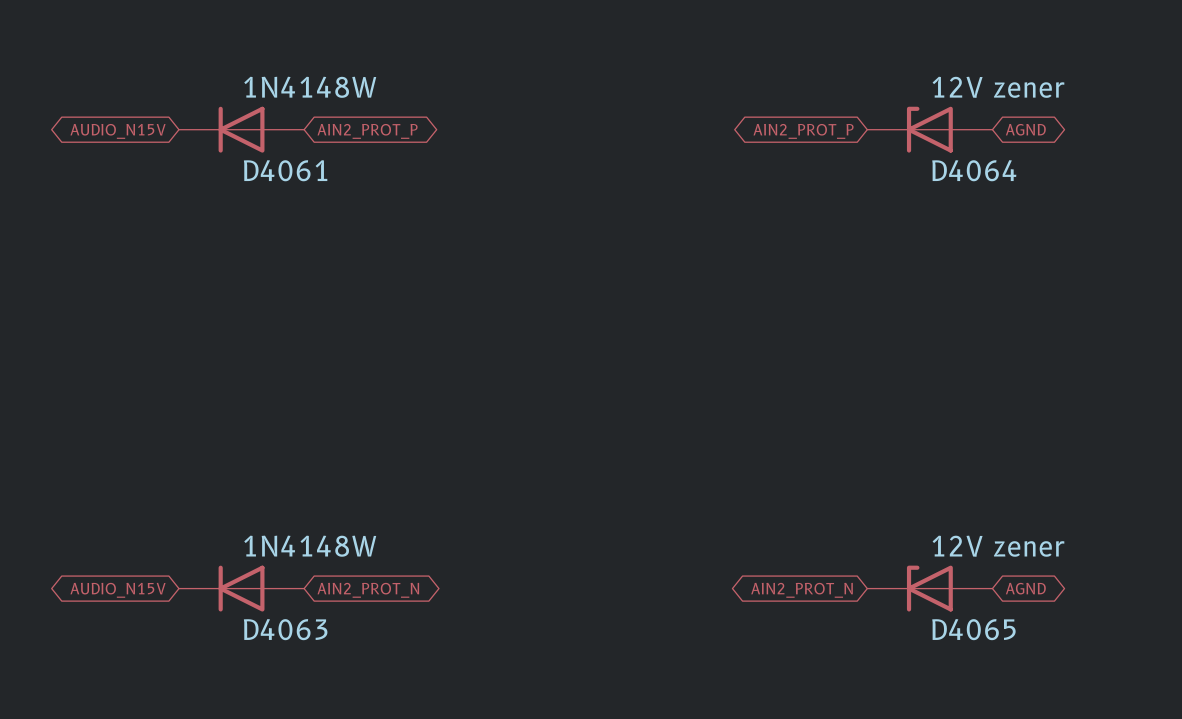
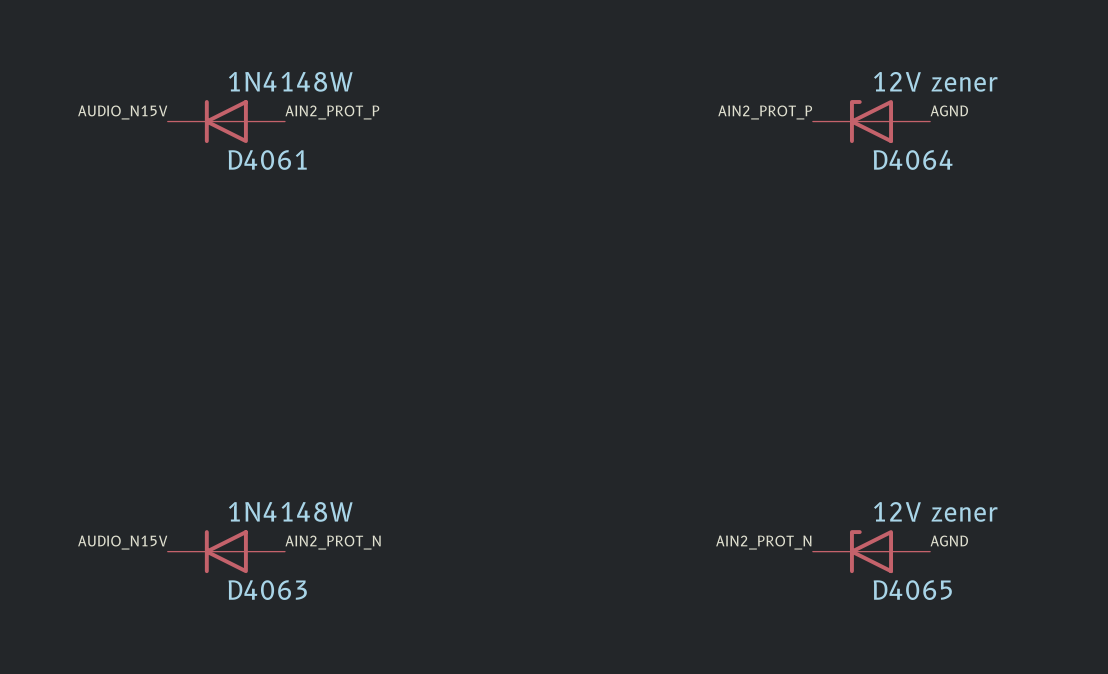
label: none -> AGND (949, 110)
label: none -> AUDIO_N15V (122, 112)
label: none -> AIN2_PROT_P (332, 112)
label: none -> AIN2_PROT_P (765, 112)
global label: AGND (1025, 129) -> none
global label: AUDIO_N15V (118, 131) -> none
global label: AIN2_PROT_P (367, 131) -> none
global label: AIN2_PROT_P (803, 131) -> none
label: none -> AGND (949, 541)
label: none -> AUDIO_N15V (122, 542)
label: none -> AIN2_PROT_N (333, 542)
label: none -> AIN2_PROT_N (763, 542)
global label: AGND (1025, 588) -> none
global label: AUDIO_N15V (118, 590) -> none
global label: AIN2_PROT_N (368, 590) -> none
global label: AIN2_PROT_N (802, 590) -> none

